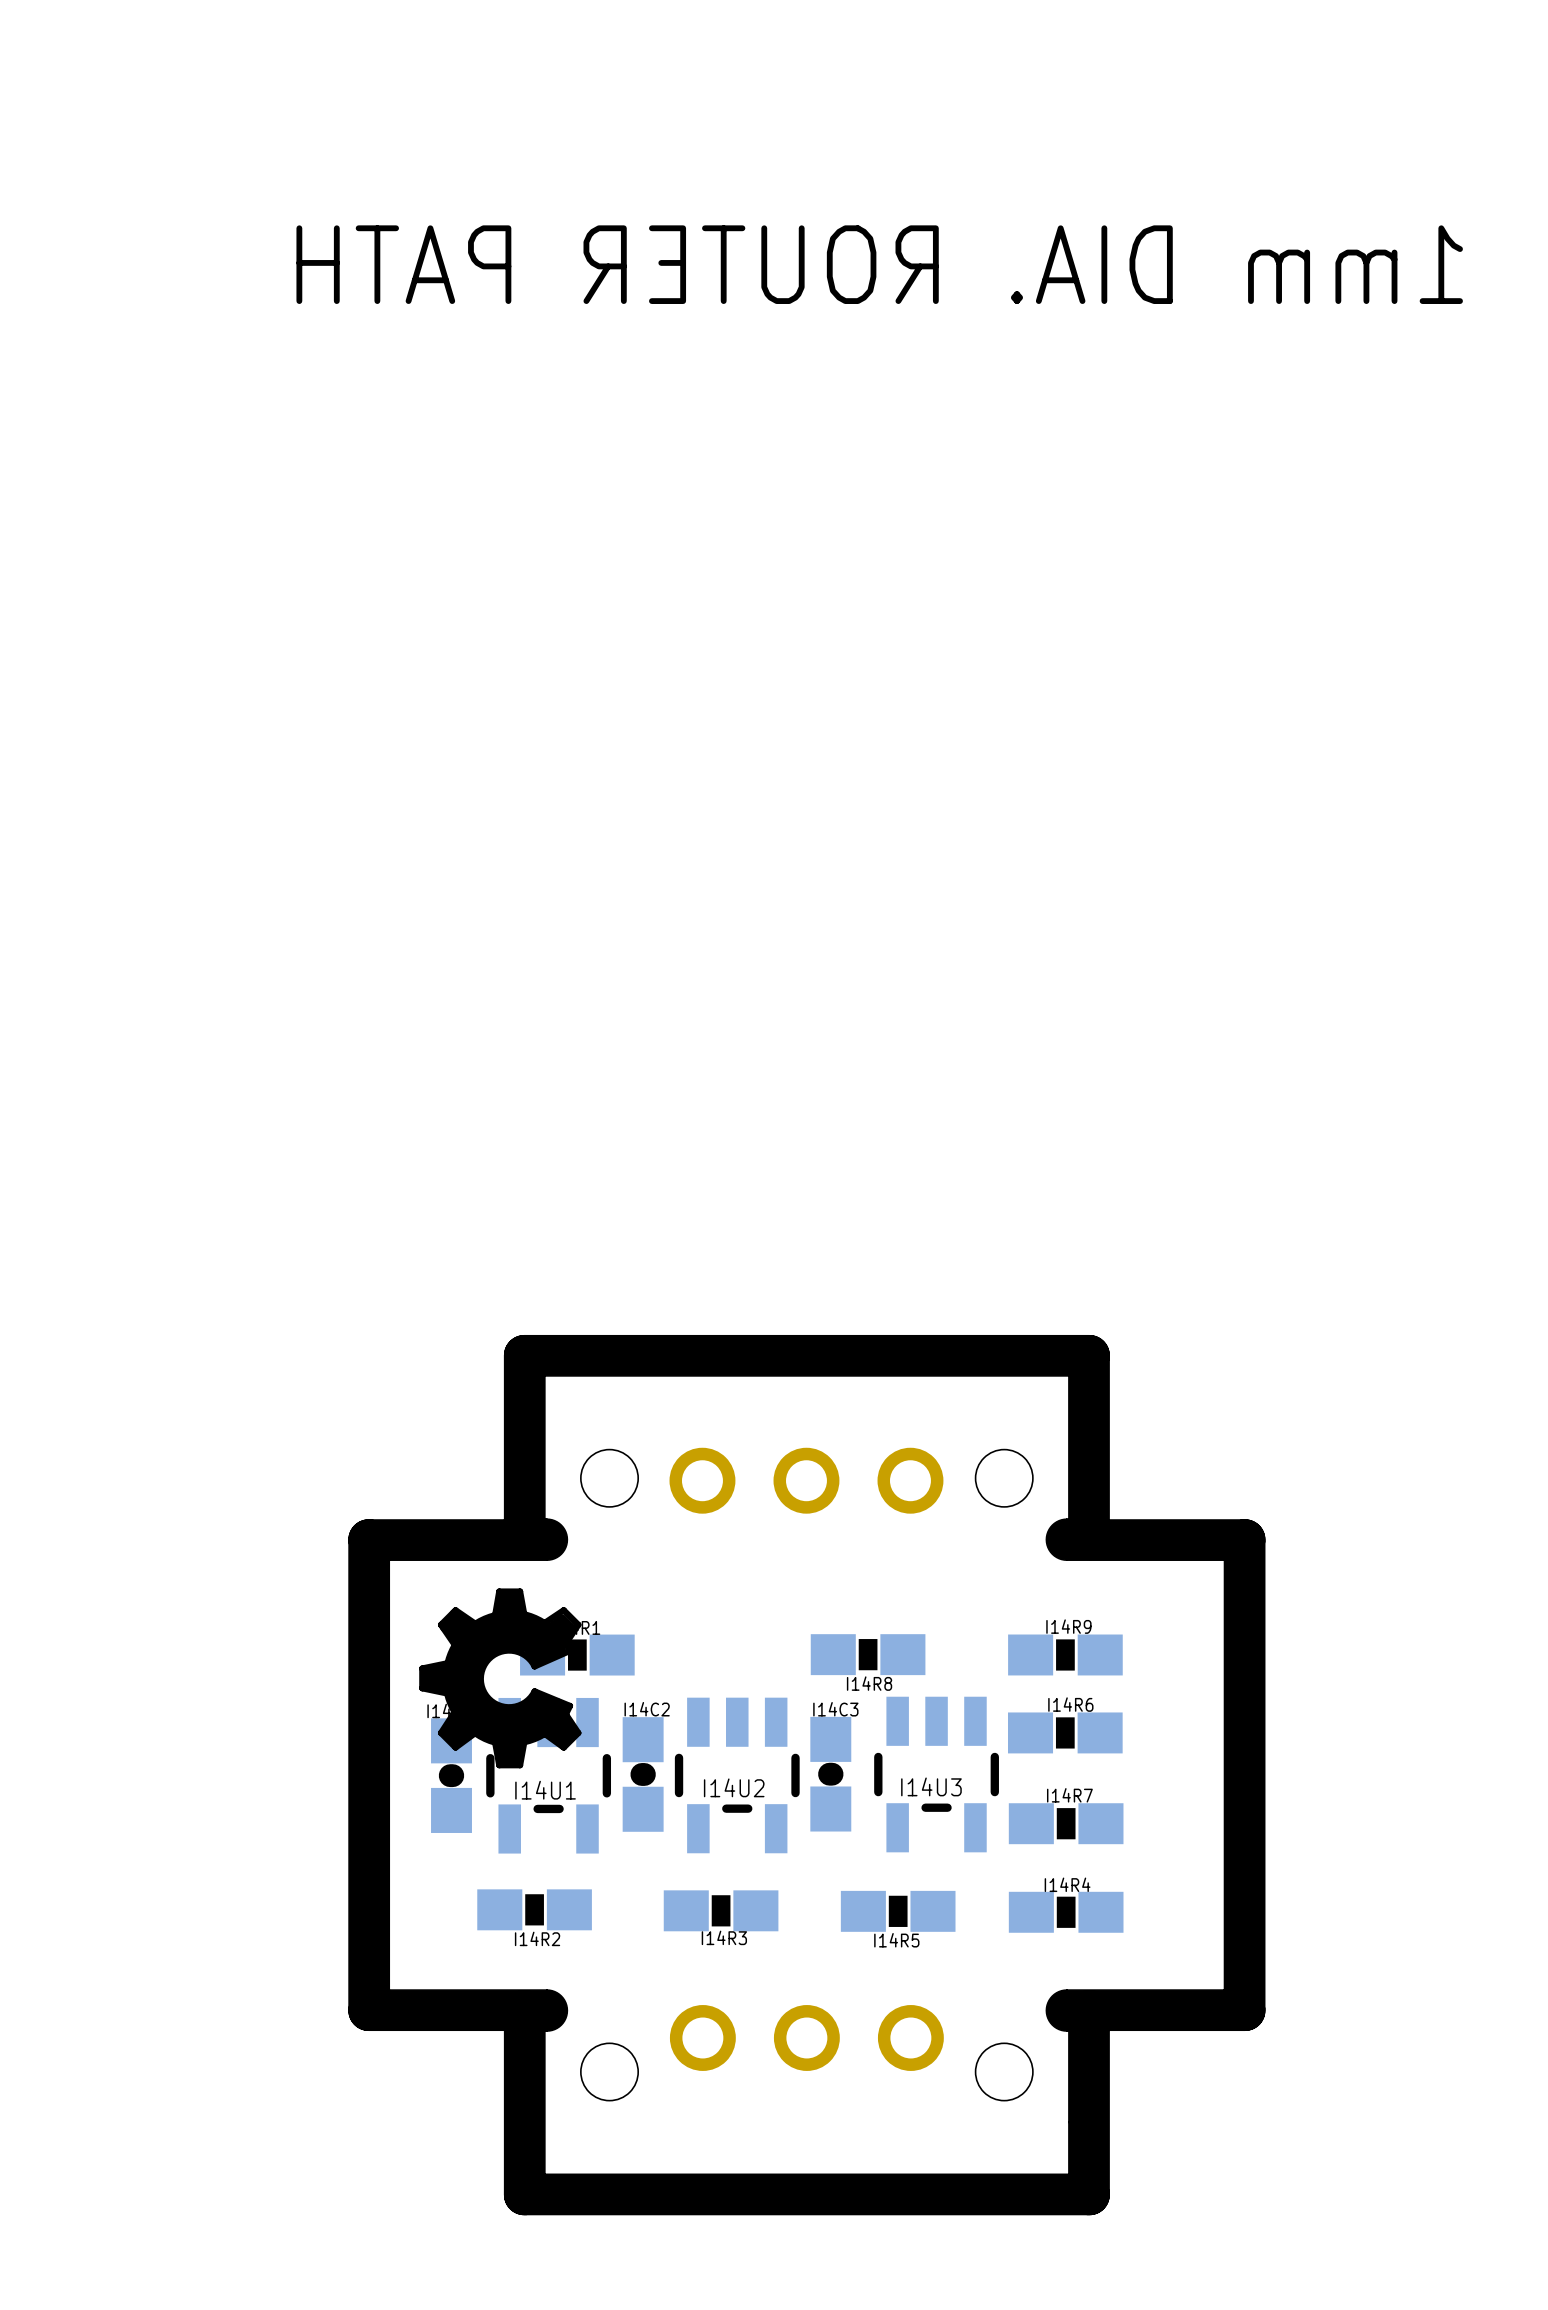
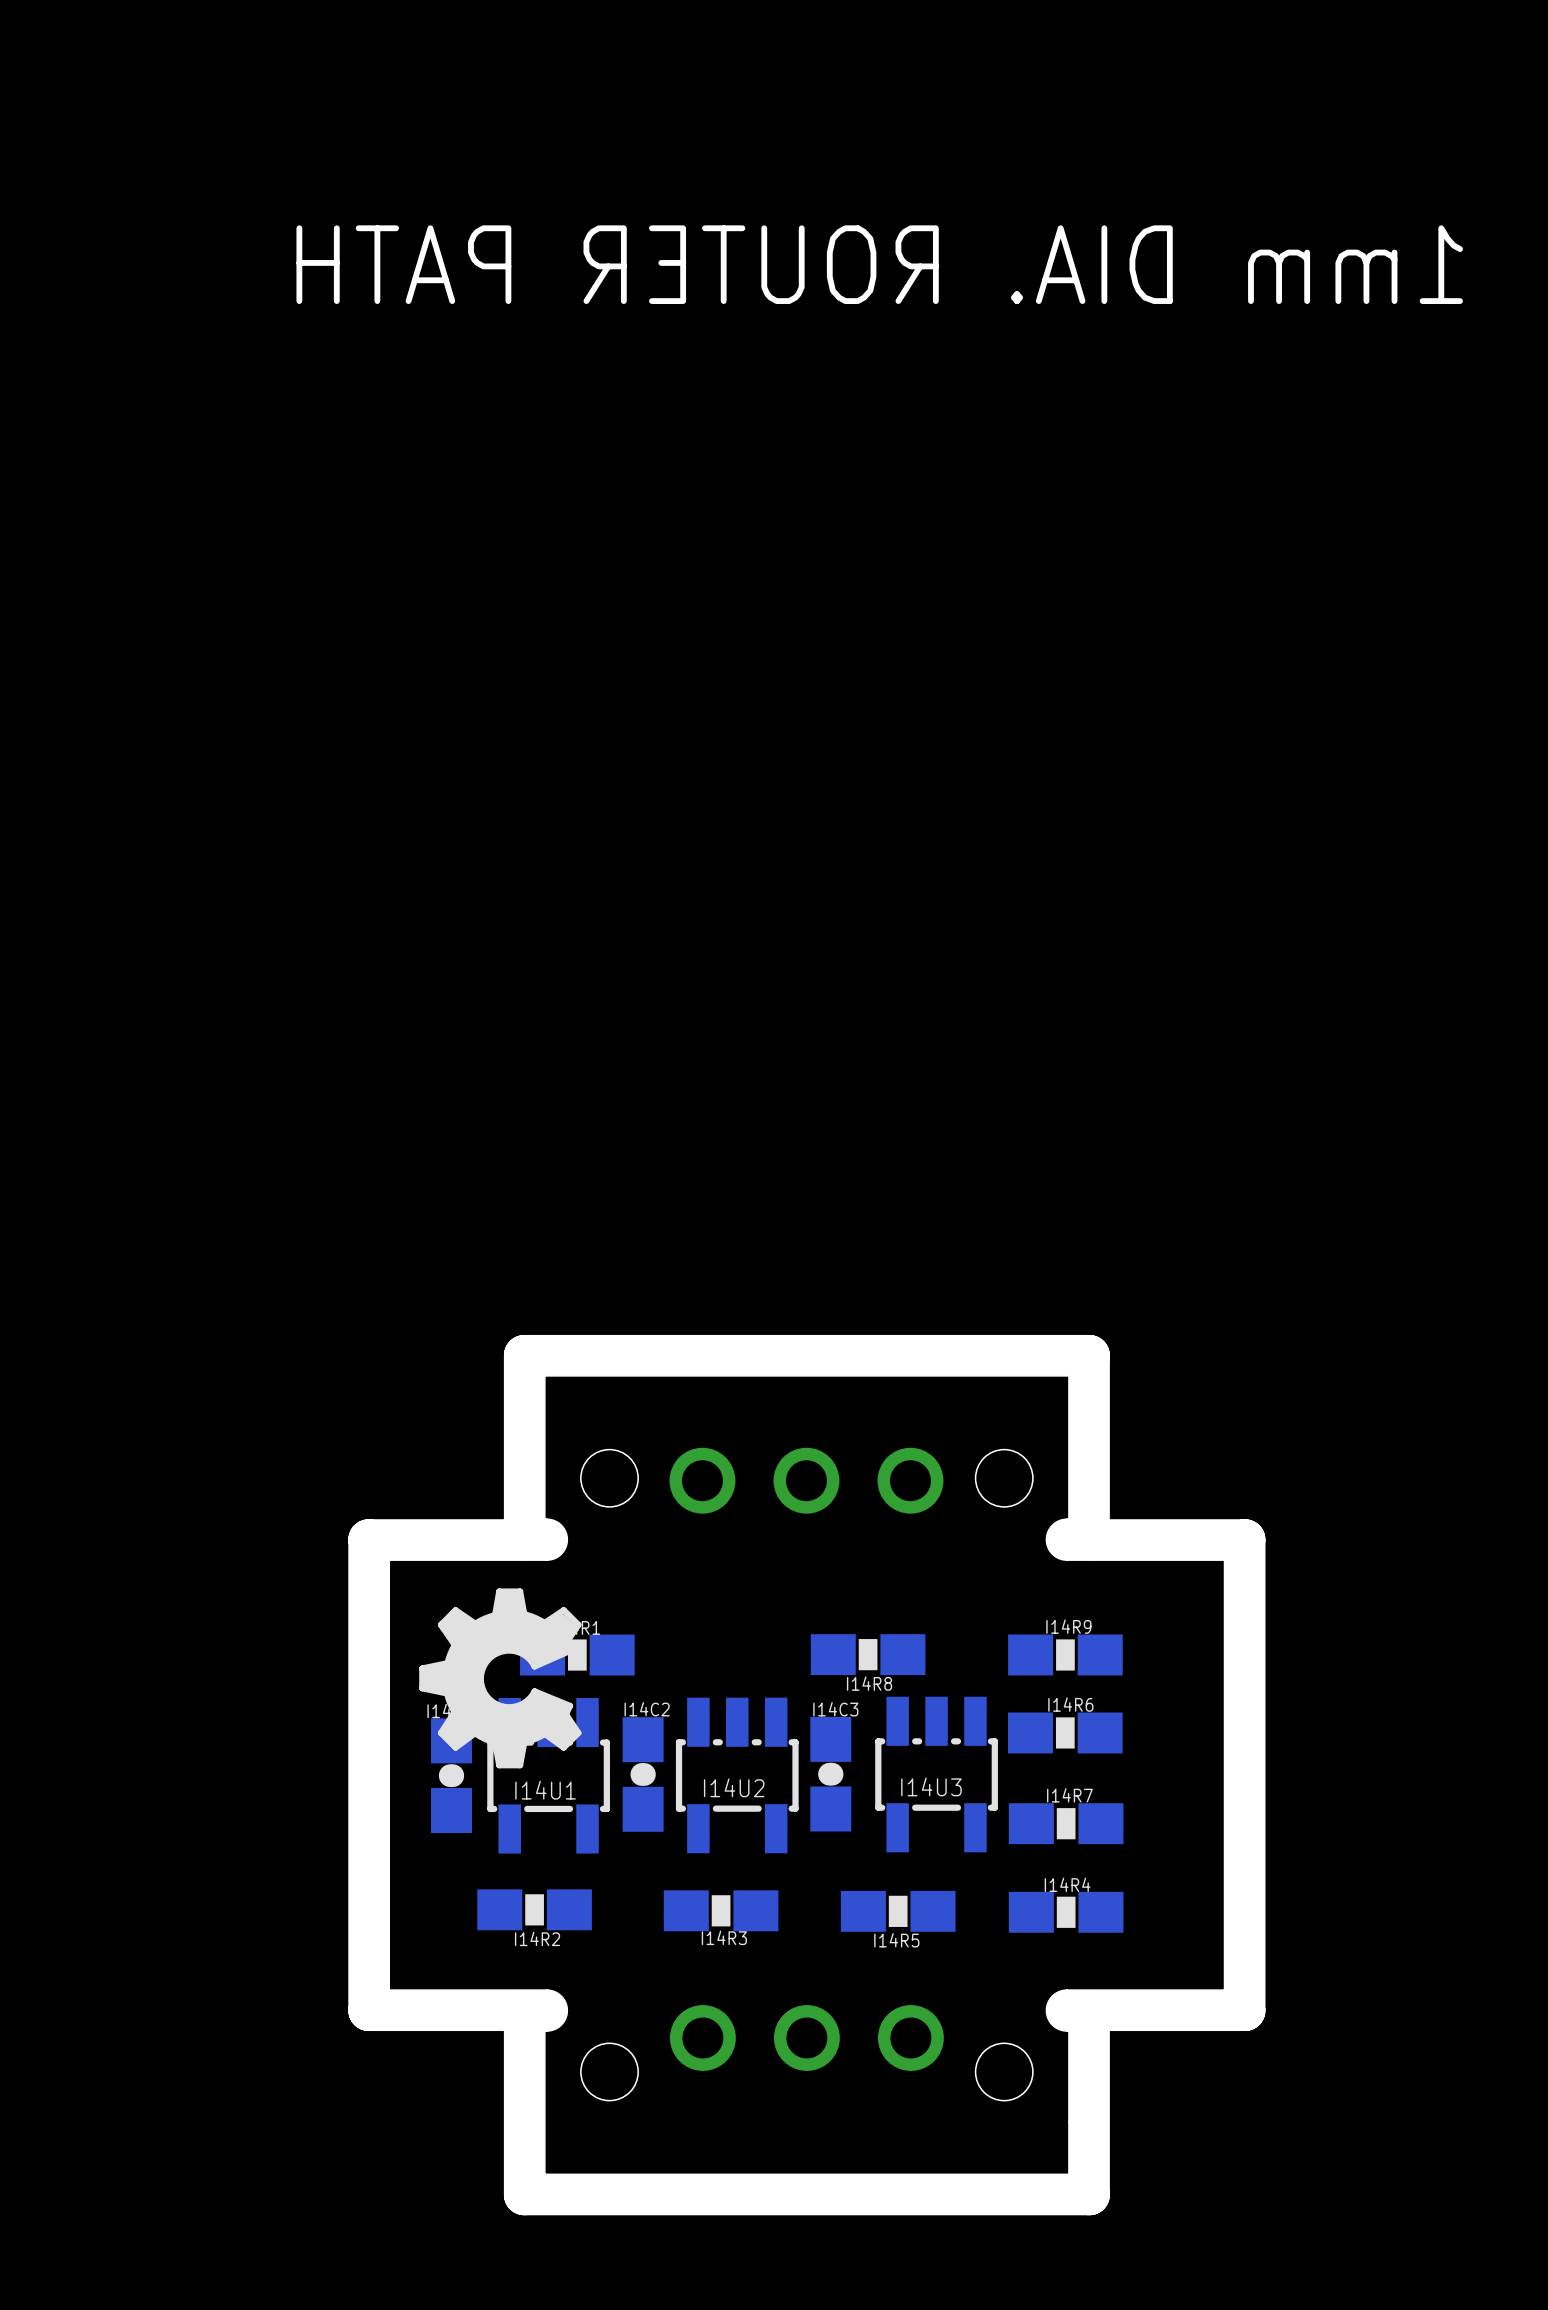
I14U3 footprint: [874, 1696, 999, 1853] -> [875, 1696, 998, 1853]
I14U1 footprint: [486, 1697, 612, 1854] -> [487, 1697, 610, 1854]
I14U2 footprint: [674, 1697, 800, 1854] -> [675, 1697, 799, 1854]

